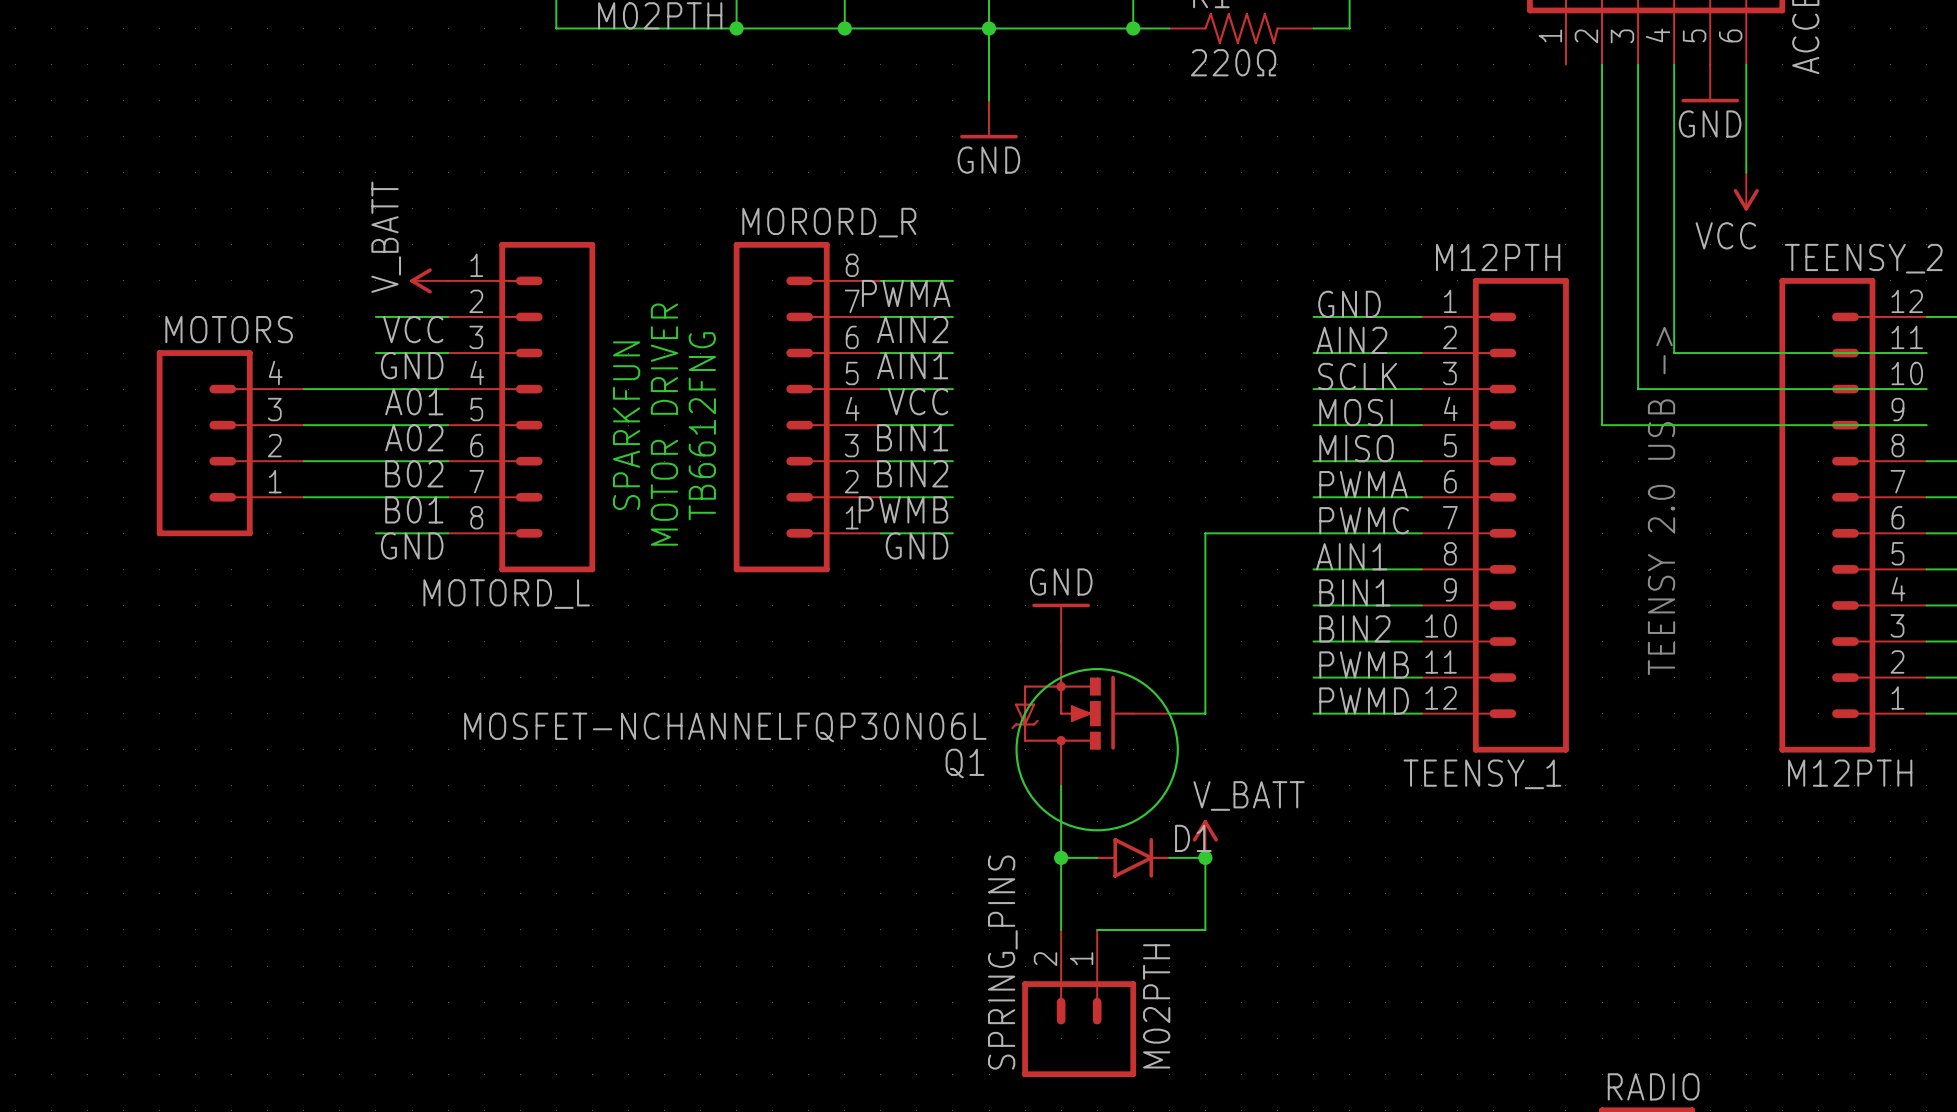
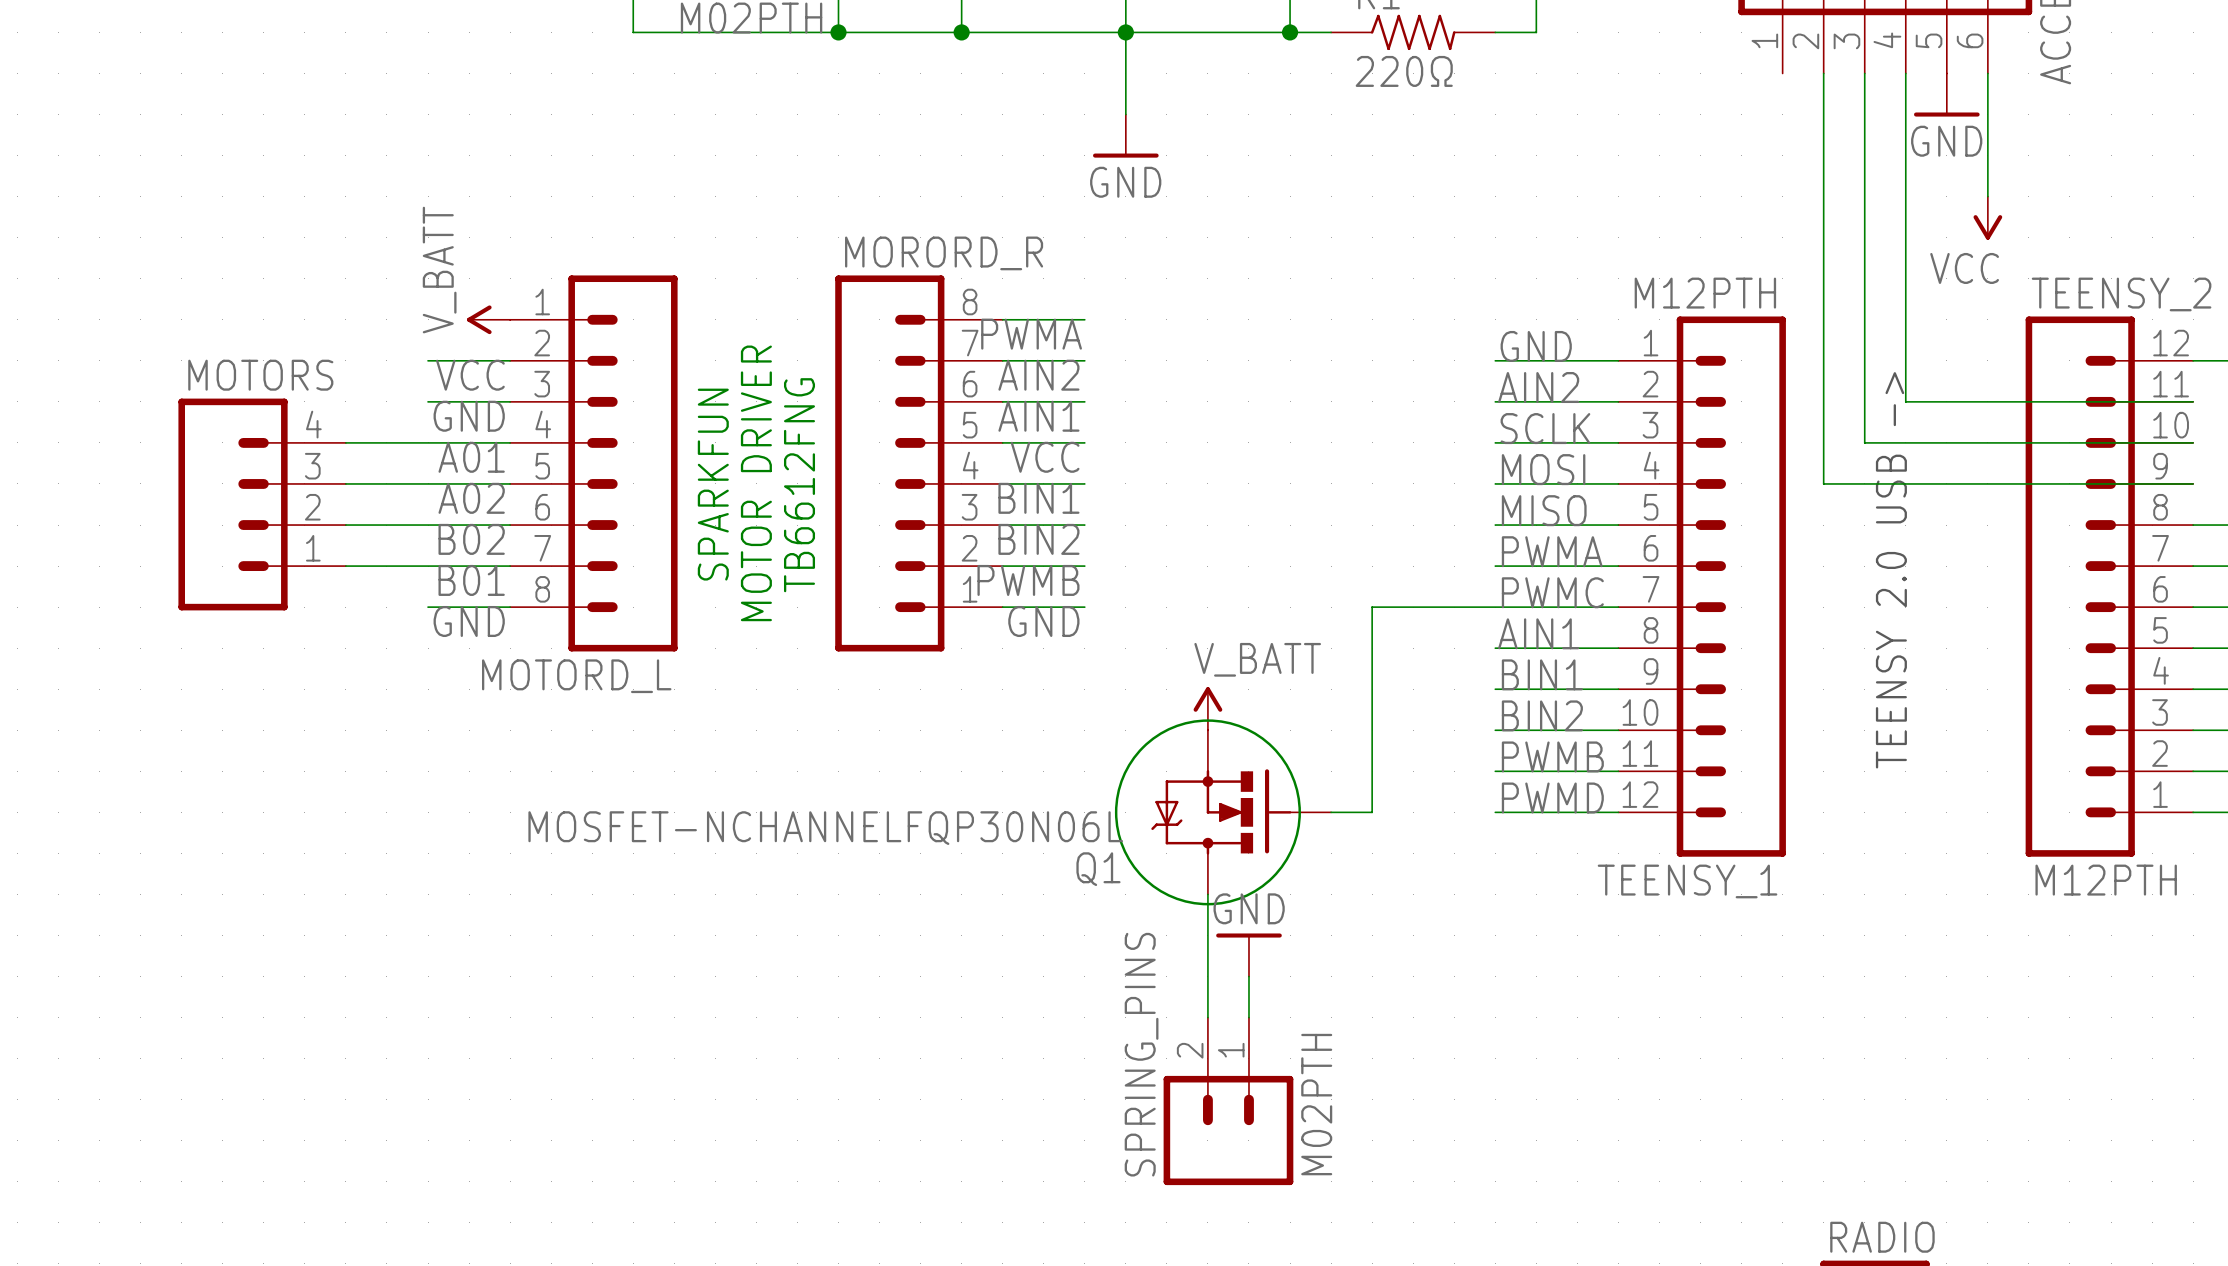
power symbol: GND (1061, 622) -> V_BATT (1207, 708)
drawing position: (1097, 749) -> (1207, 812)
power symbol: none -> GND (1248, 955)
power symbol: V_BATT (1205, 838) -> none
wire: (1061, 857) (1097, 857) -> (1248, 1017) (1248, 976)
junction: (1061, 857) -> none
D1: (1133, 857) -> none
wire: (1169, 857) (1205, 857) (1205, 929) (1097, 929) -> none
junction: (1205, 857) -> none
SPRING_PINS position: (1079, 1003) -> (1228, 1101)

